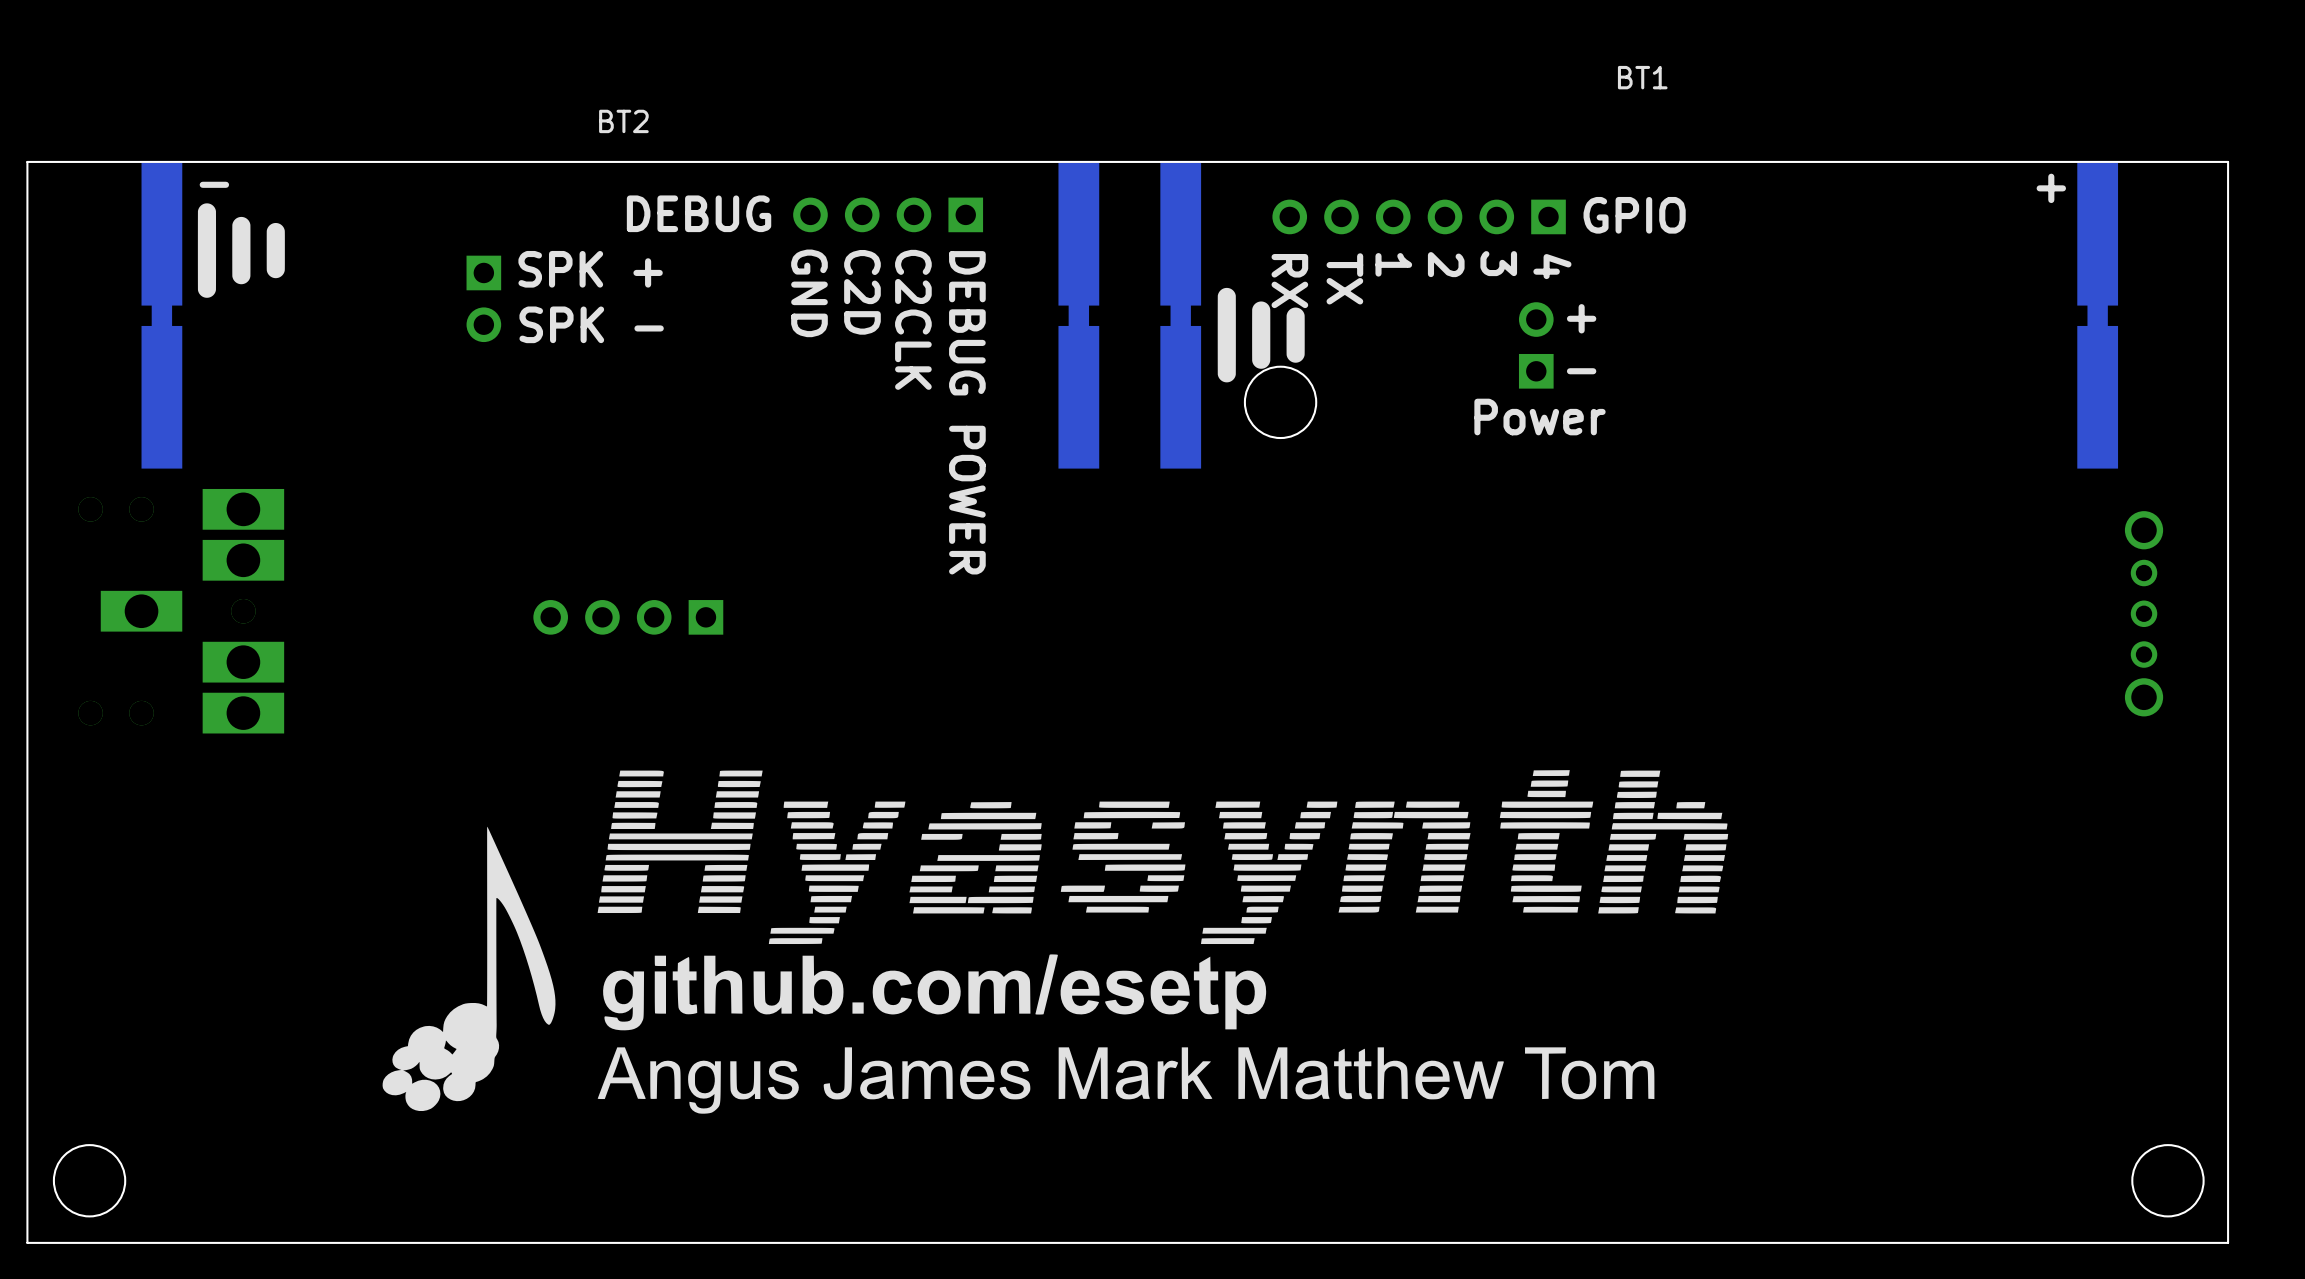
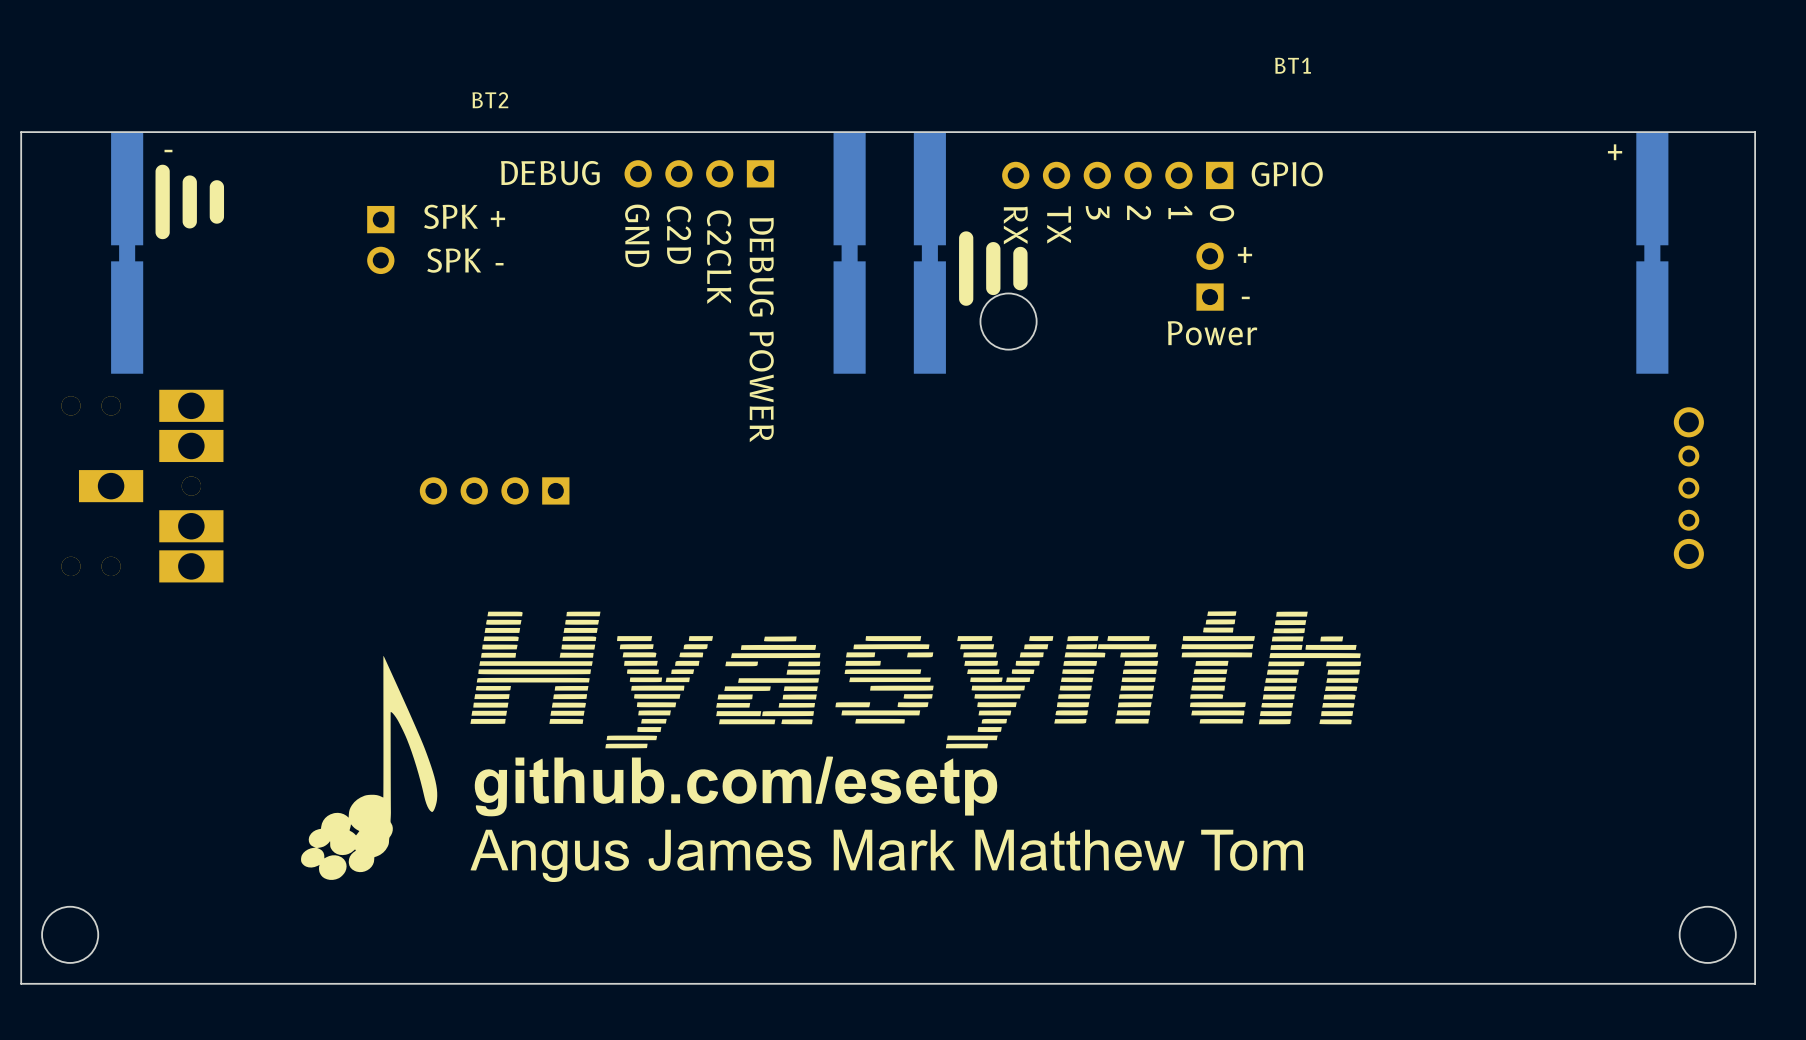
text: 3 (1498, 263) -> 1 (1180, 212)
text: 1 (1393, 264) -> 3 (1097, 212)
text: 4 (1552, 266) -> 0 (1222, 213)

